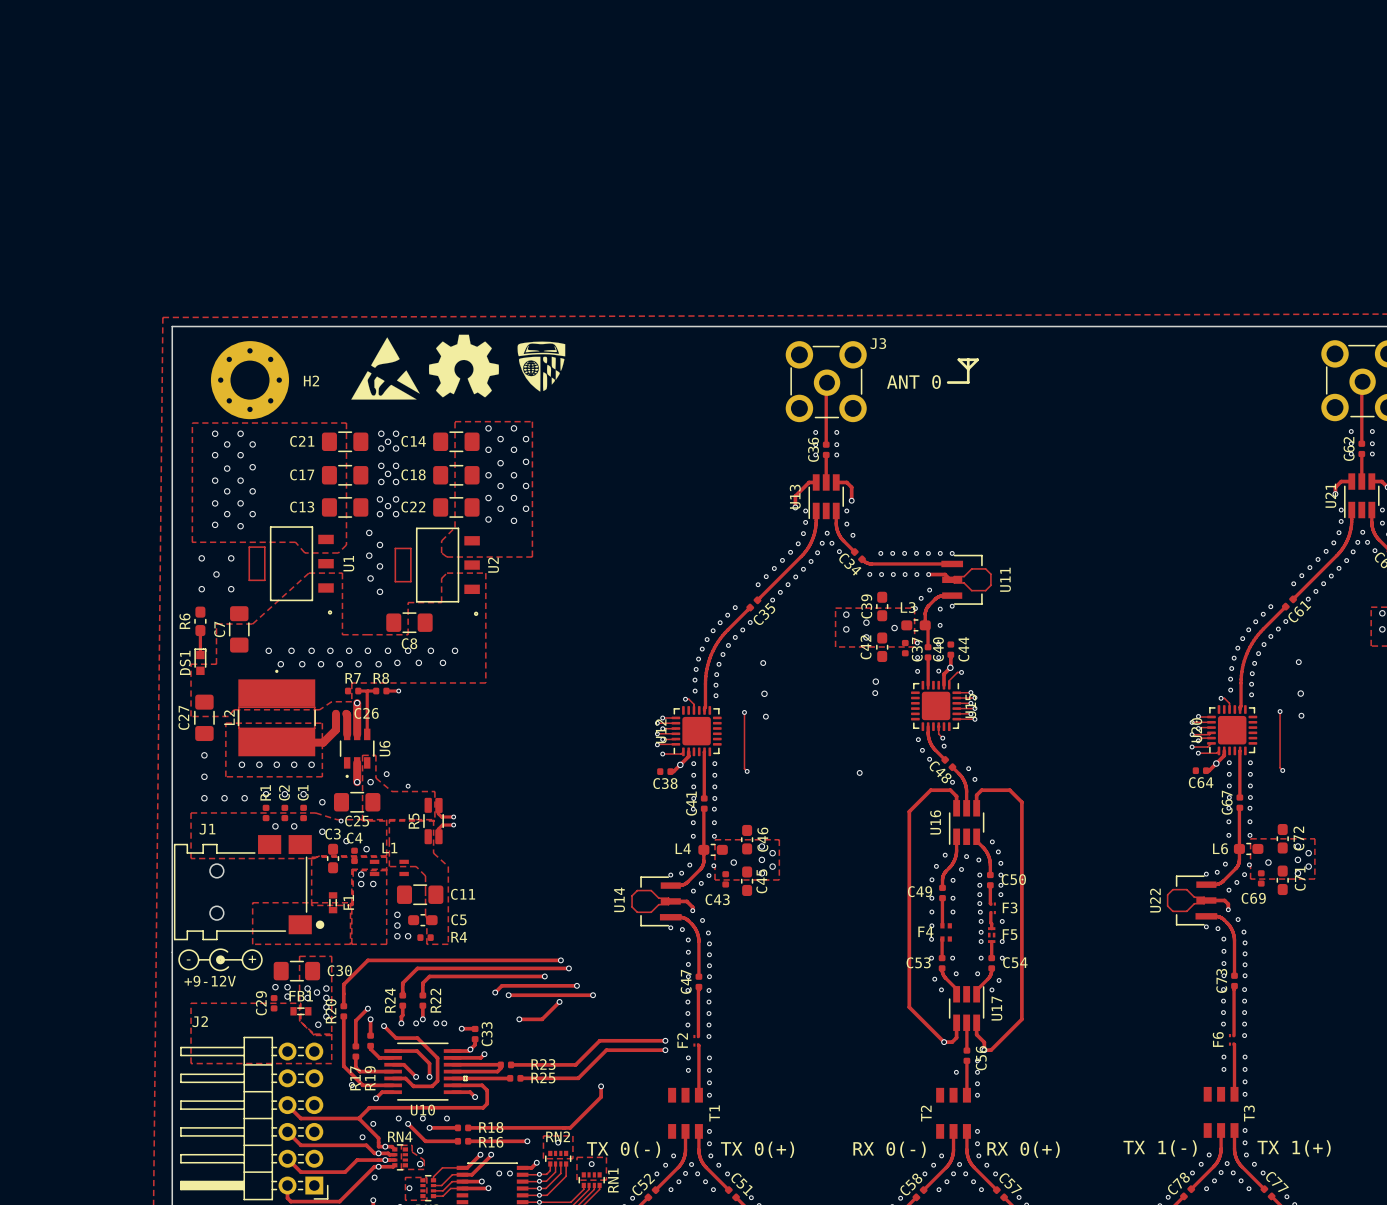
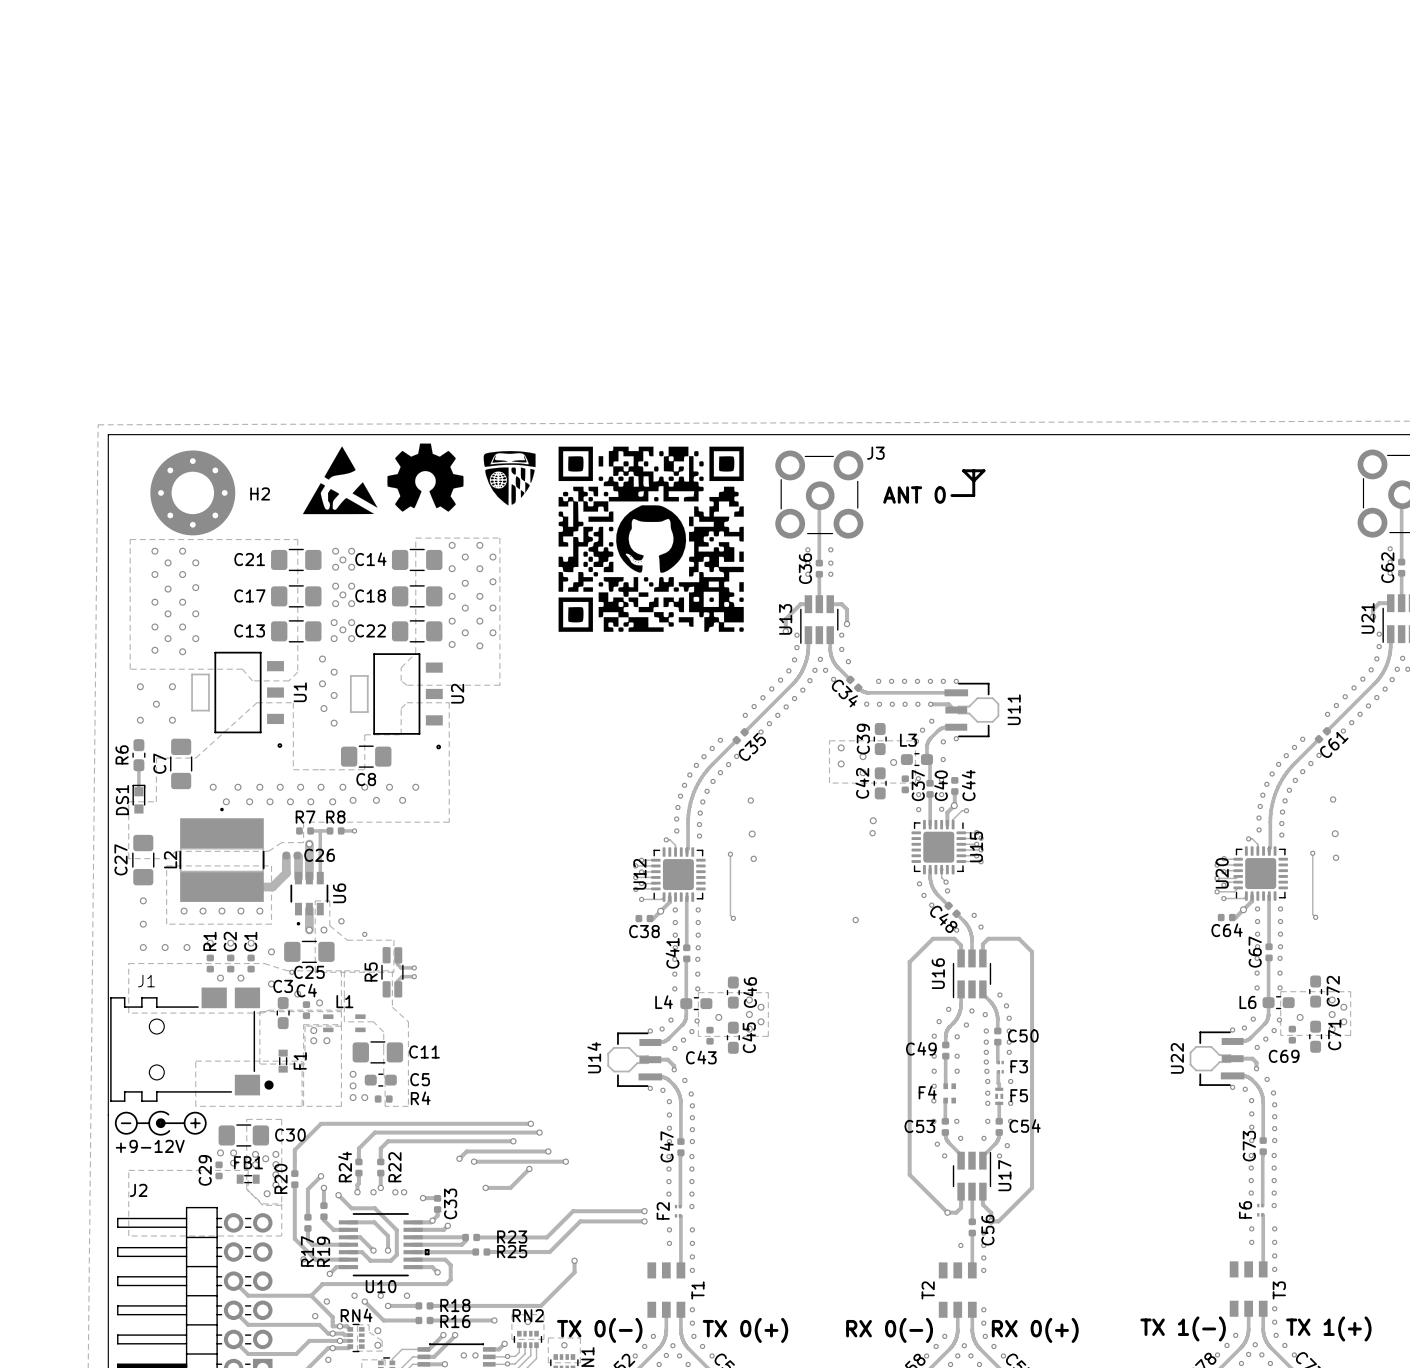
drawing: none -> [558, 446, 744, 632]

